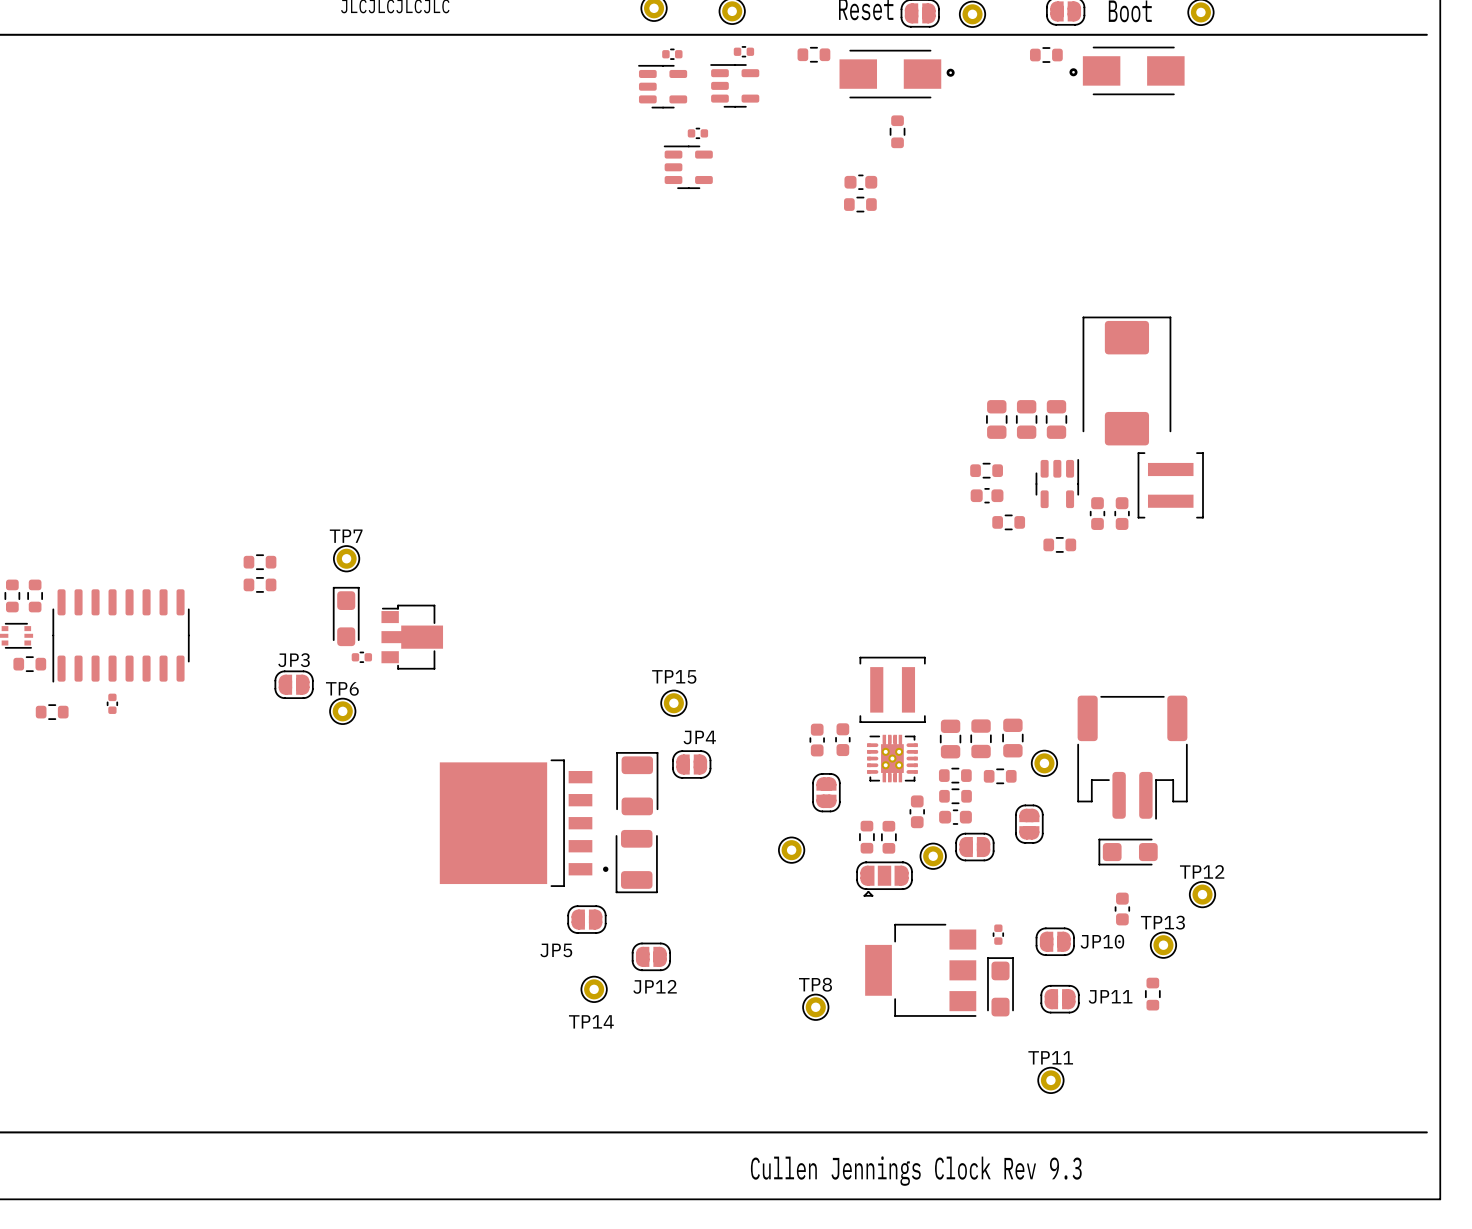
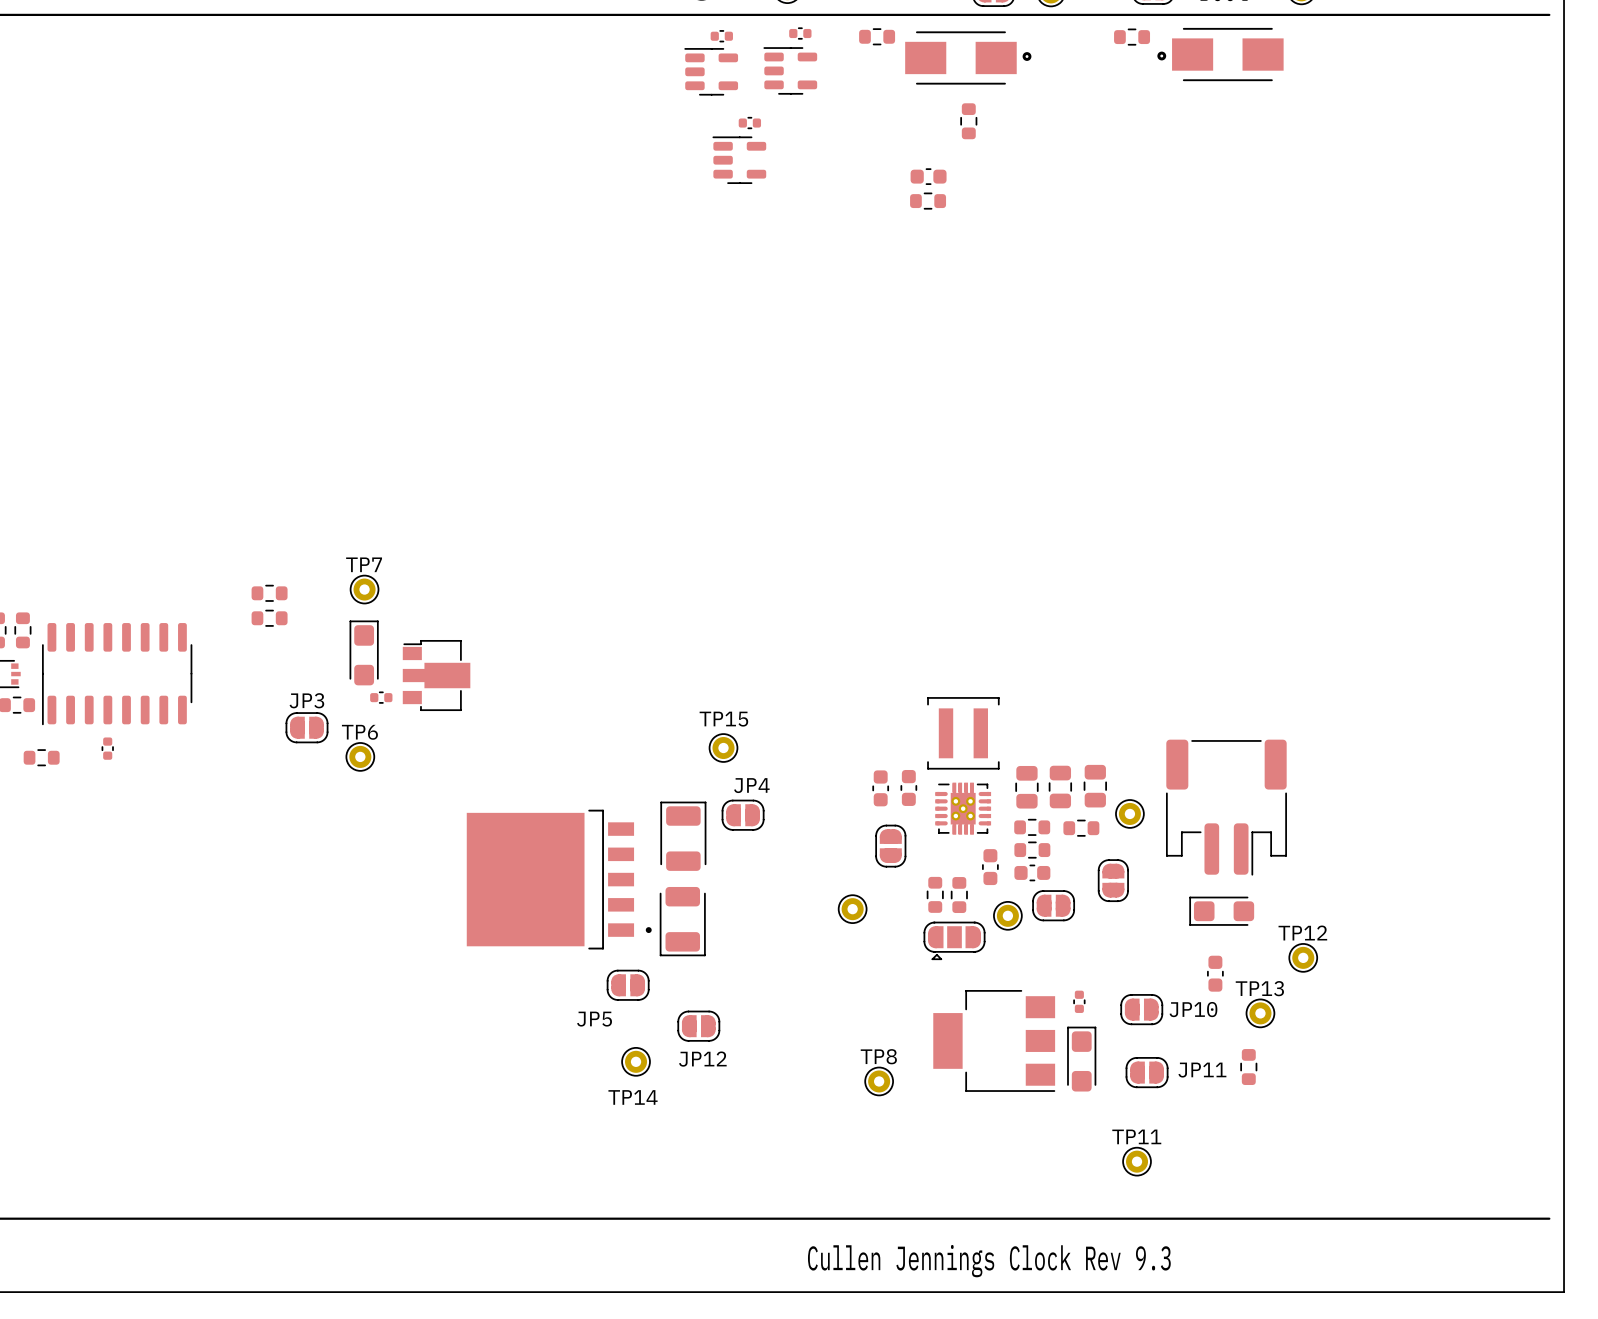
part: (1126, 381) -> none
part: (996, 419) -> none
part: (1026, 419) -> none
part: (1056, 419) -> none
part: (986, 470) -> none
part: (1057, 483) -> none
part: (1170, 485) -> none
part: (987, 495) -> none
part: (1097, 513) -> none
part: (1122, 513) -> none
part: (1008, 522) -> none
part: (1059, 544) -> none

